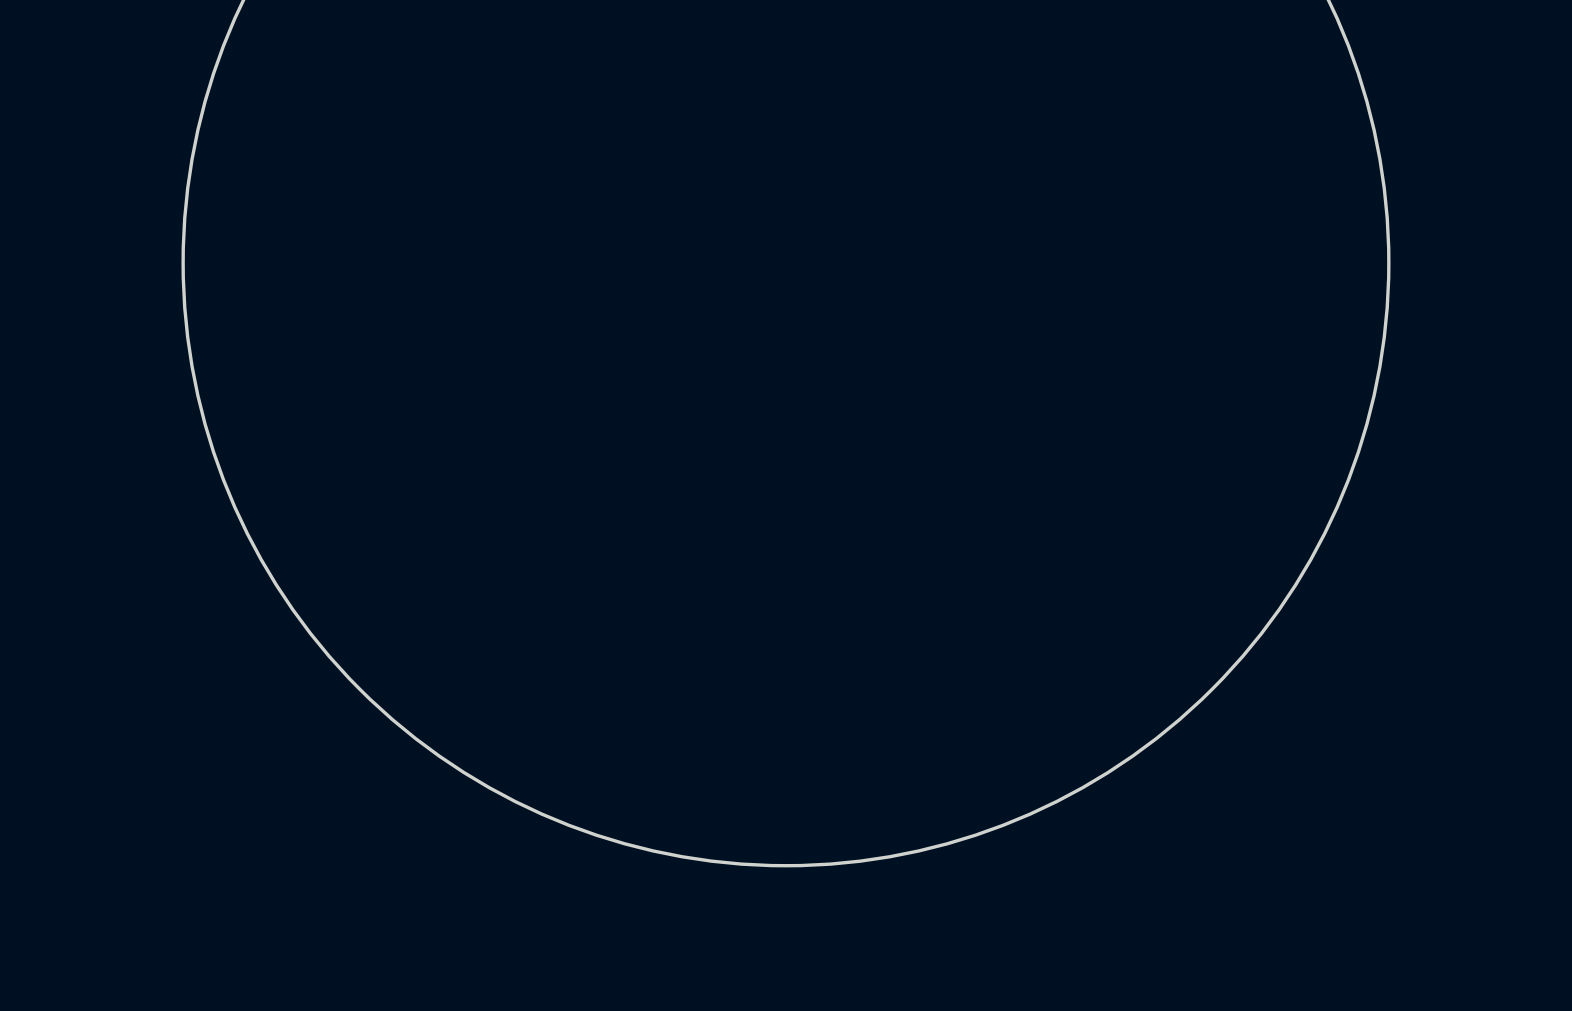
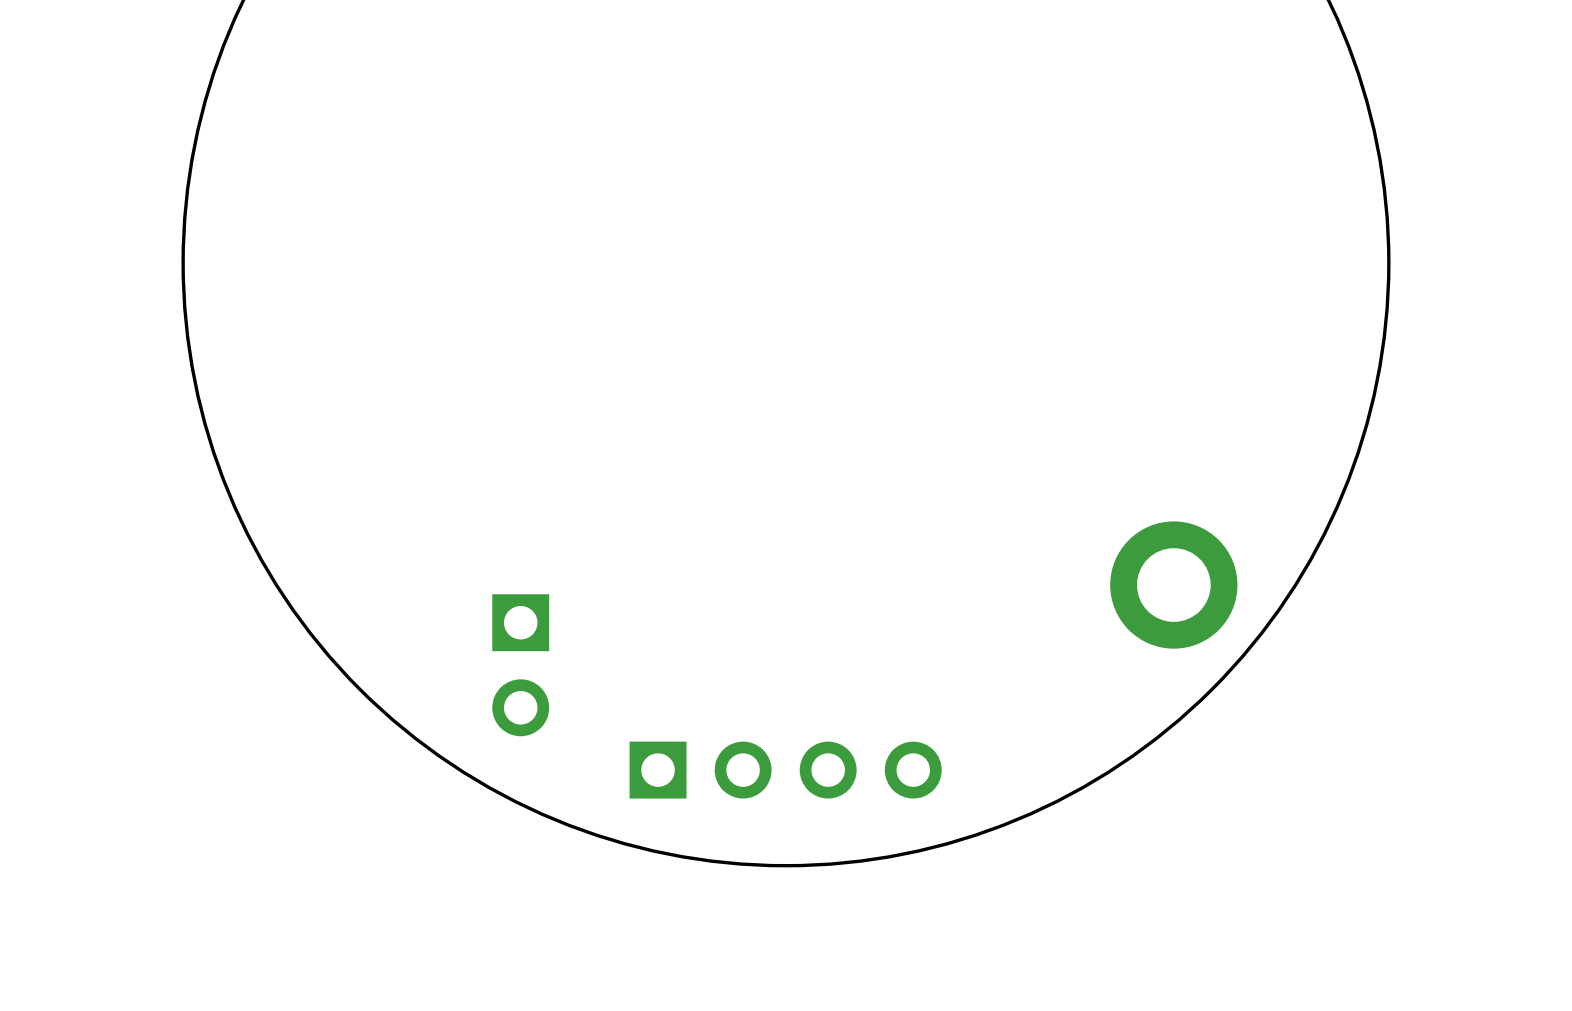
part: none -> (1173, 585)
part: none -> (520, 665)
part: none -> (785, 770)

